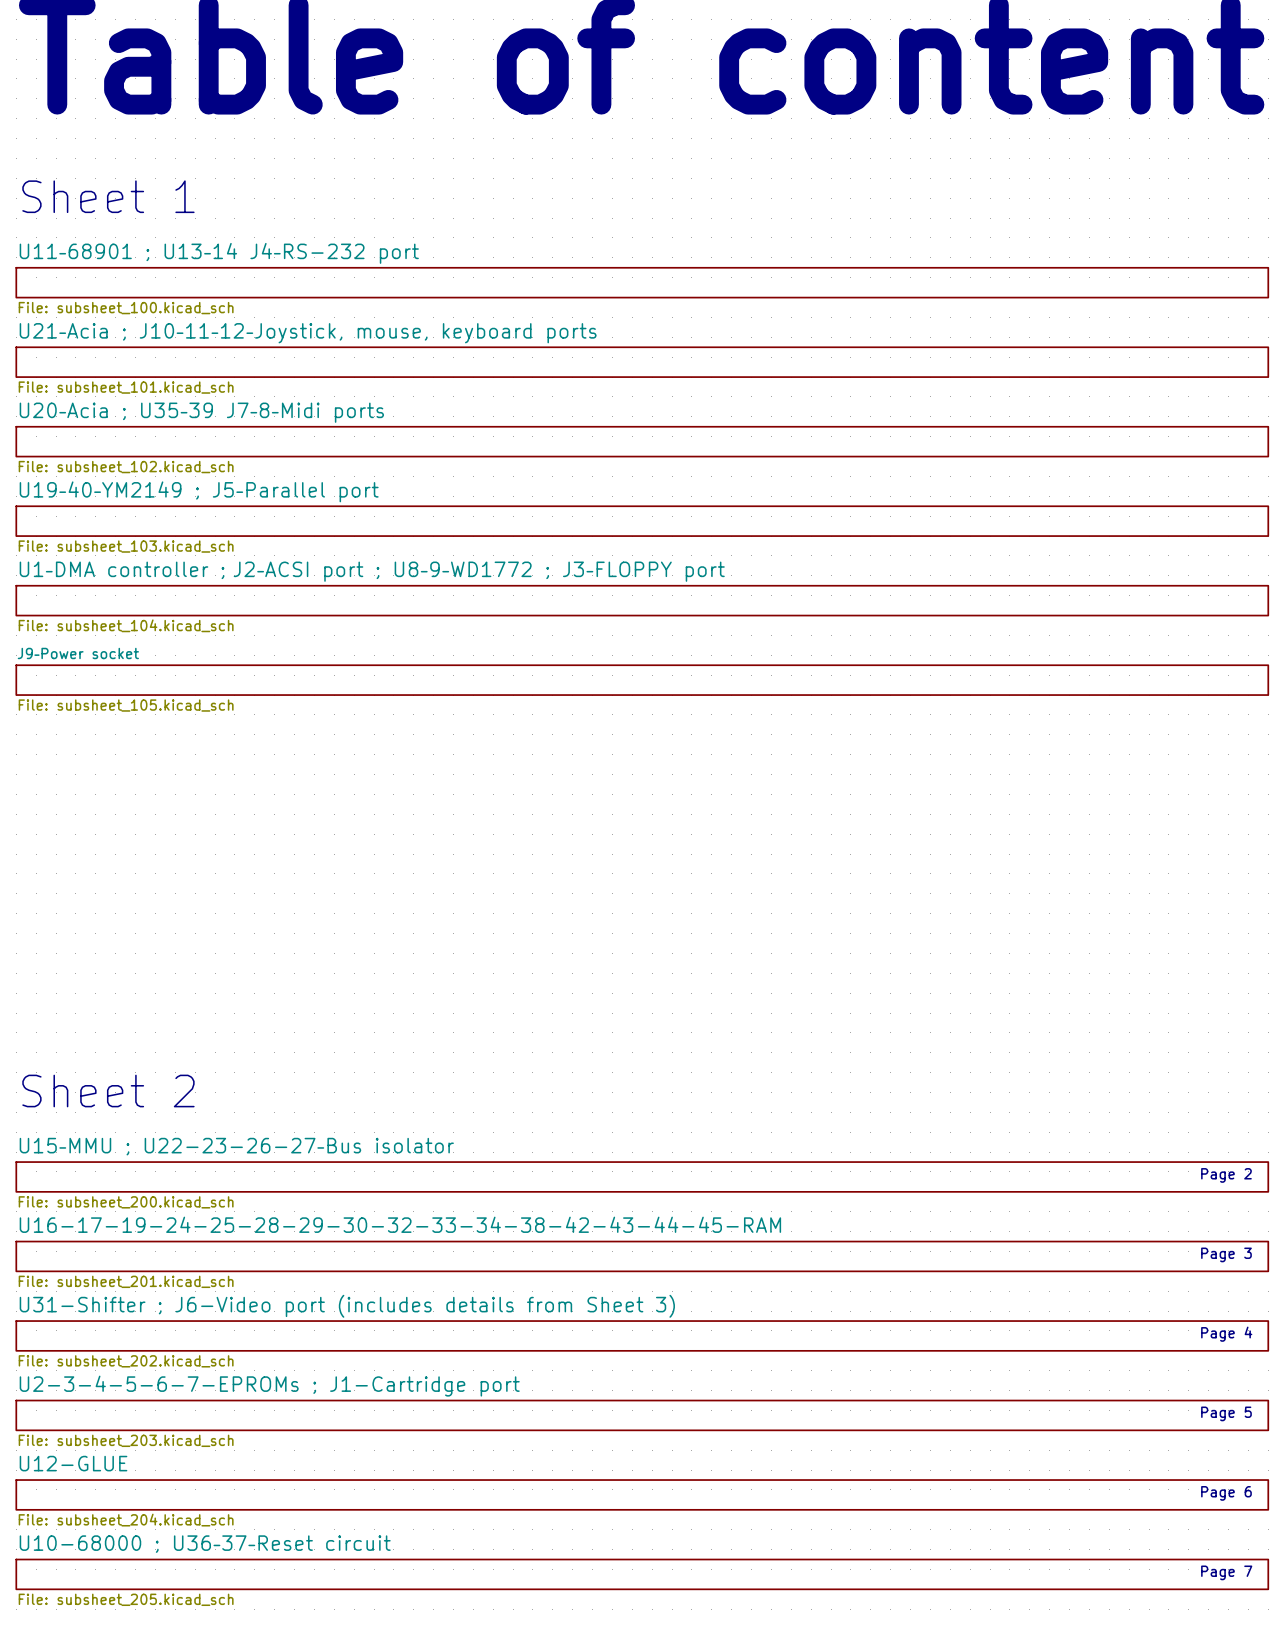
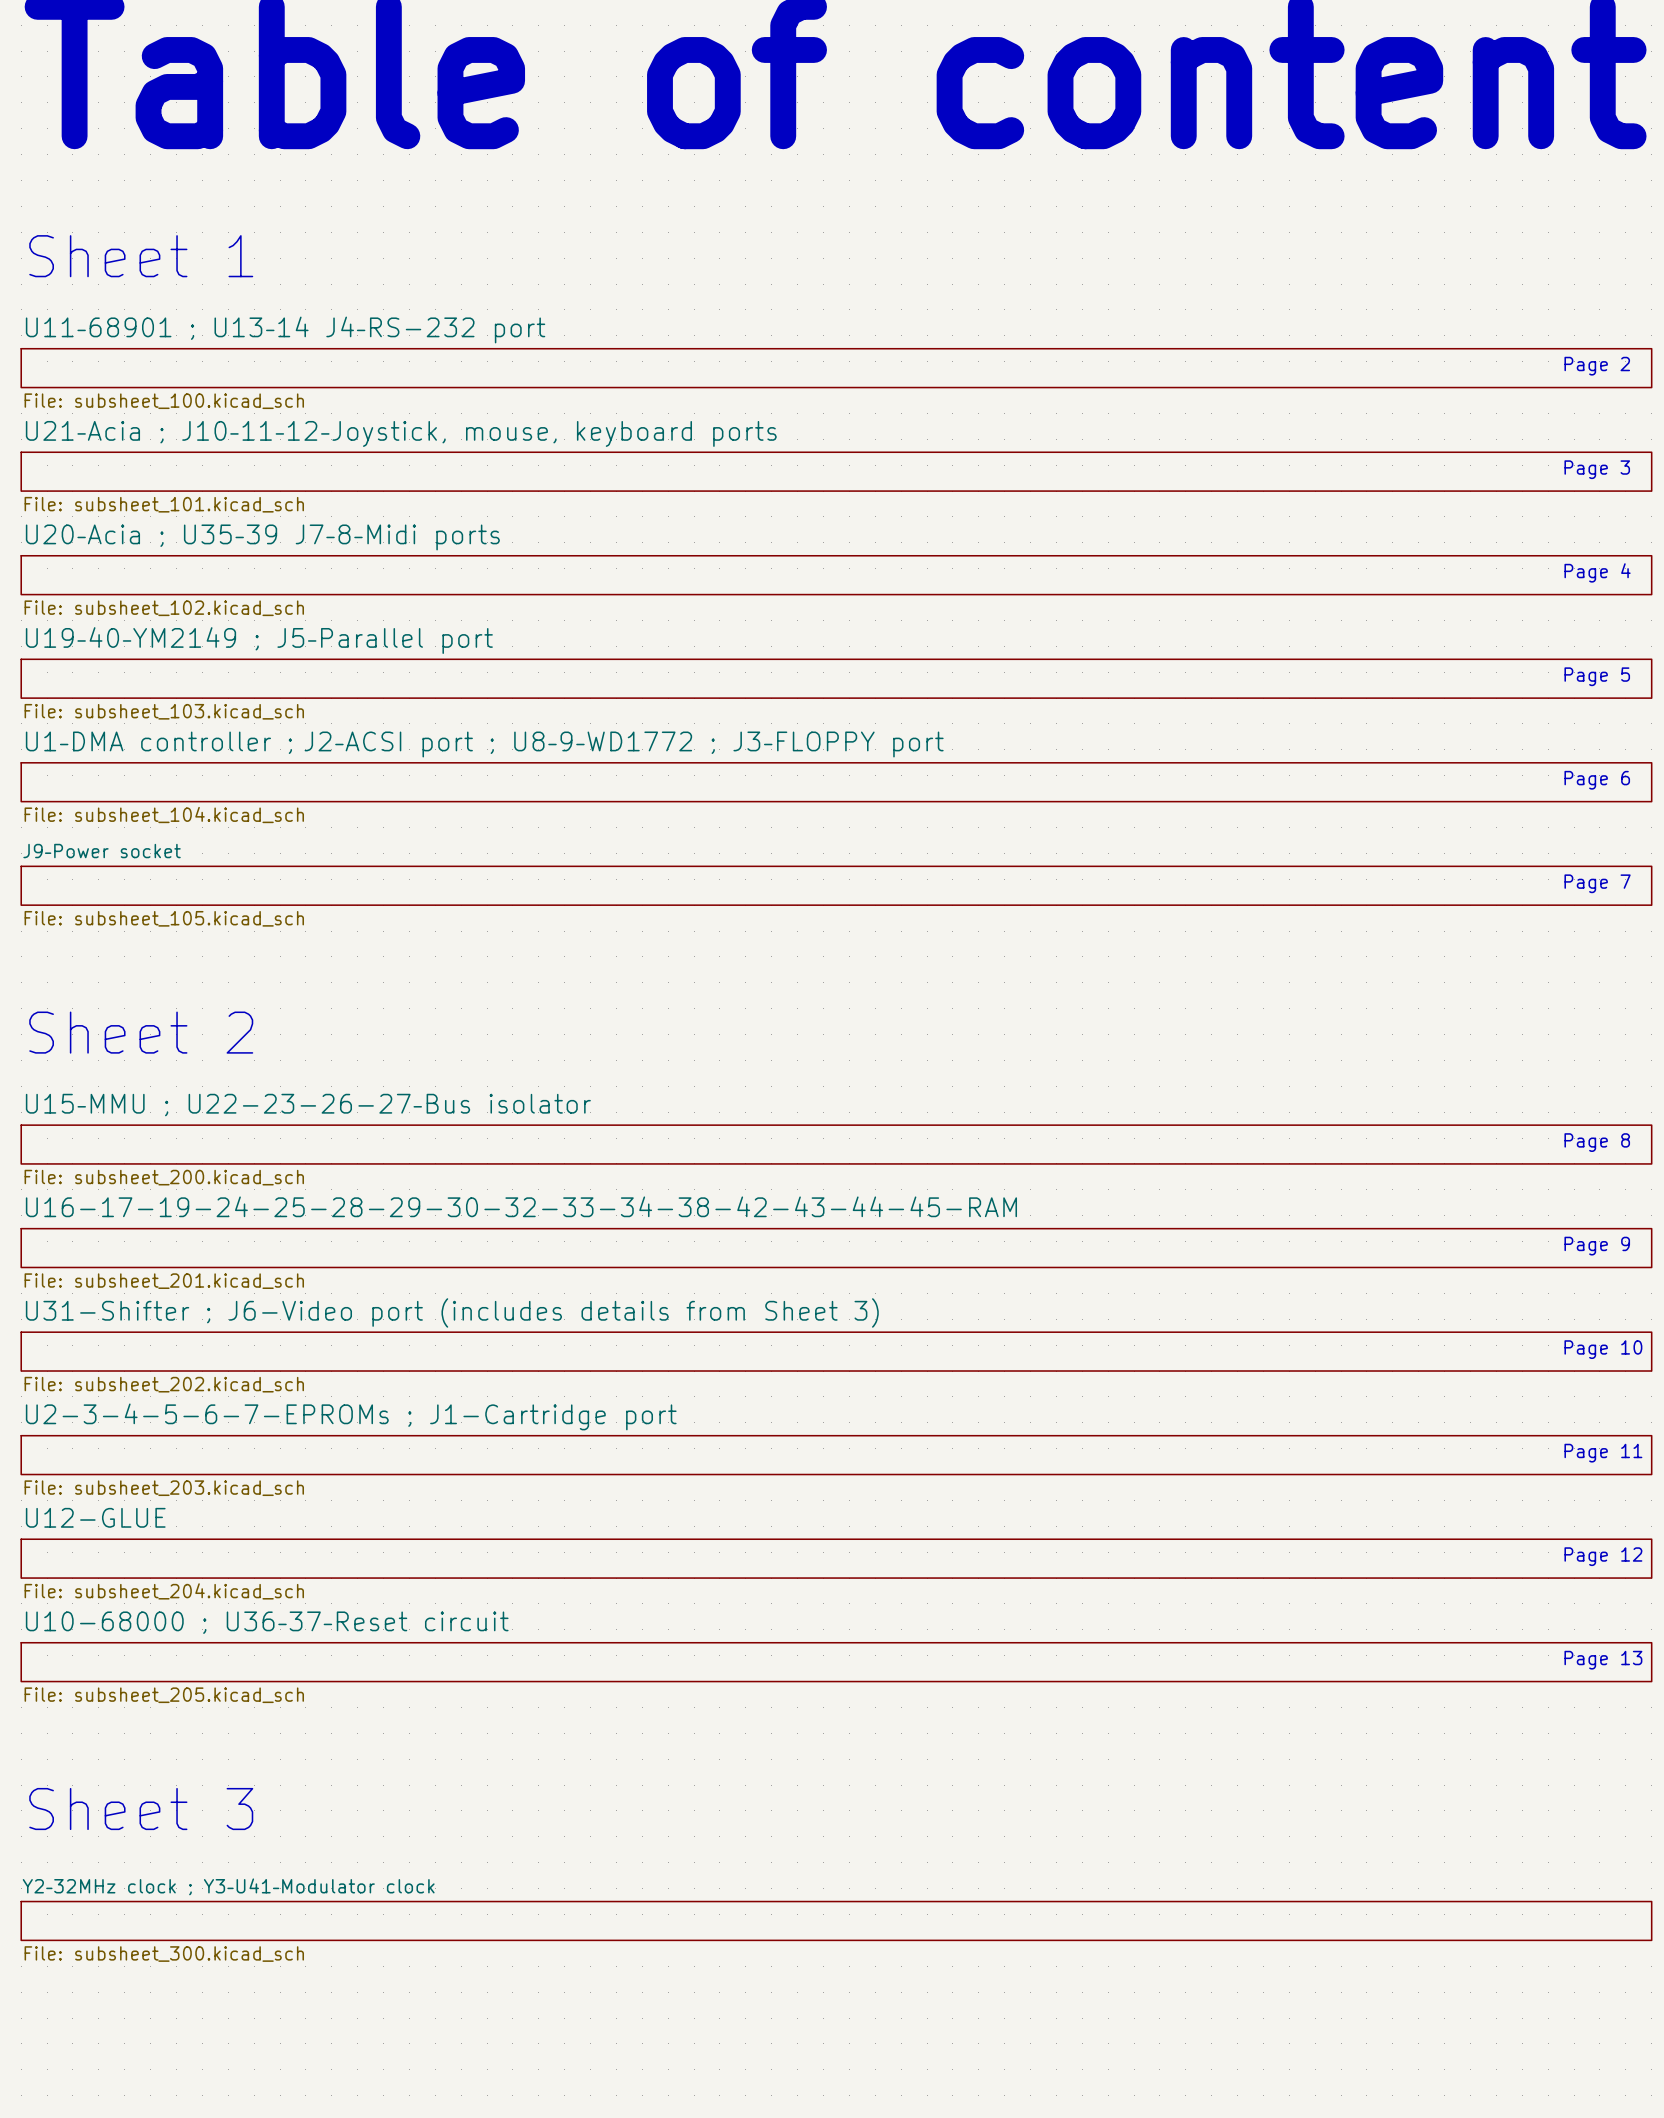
text: none -> Page 2 (1597, 366)
text: none -> Page 3 (1597, 469)
text: none -> Page 4 (1597, 572)
text: none -> Page 5 (1597, 676)
text: none -> Page 6 (1597, 780)
text: none -> Page 7 (1597, 883)
text: none -> Sheet 2 (141, 1032)
text: none -> Page 8 (1597, 1142)
text: none -> Page 9 (1597, 1246)
text: none -> Page 10 (1603, 1349)
text: Sheet 2 (108, 1090) -> none
text: none -> Page 11 (1603, 1453)
text: Page 2 (1226, 1175) -> Page 12 (1603, 1556)
sheet U15–MMU ; U22-23-26-27–Bus isolator position: (642, 1176) -> (836, 1144)
text: Page 3 (1226, 1254) -> Page 13 (1603, 1660)
sheet U16-17-19-24-25-28-29-30-32-33-34-38-42-43-44-45-RAM position: (642, 1256) -> (836, 1248)
text: Page 4 (1226, 1334) -> none
sheet U31-Shifter ; J6-Video port (includes details from Sheet 3) position: (642, 1335) -> (836, 1351)
text: none -> Sheet 3 (141, 1809)
text: Page 5 (1226, 1413) -> none
sheet U2-3-4-5-6-7-EPROMs ; J1-Cartridge port position: (642, 1415) -> (836, 1455)
sheet Y2–32MHz clock ; Y3–U41–Modulator clock: none -> File: subsheet_300.kicad_sch (836, 1920)
text: Page 6 (1226, 1493) -> none
sheet U12-GLUE position: (642, 1494) -> (836, 1558)
text: Page 7 (1226, 1572) -> none
sheet U10-68000 ; U36–37–Reset circuit position: (642, 1574) -> (836, 1662)

